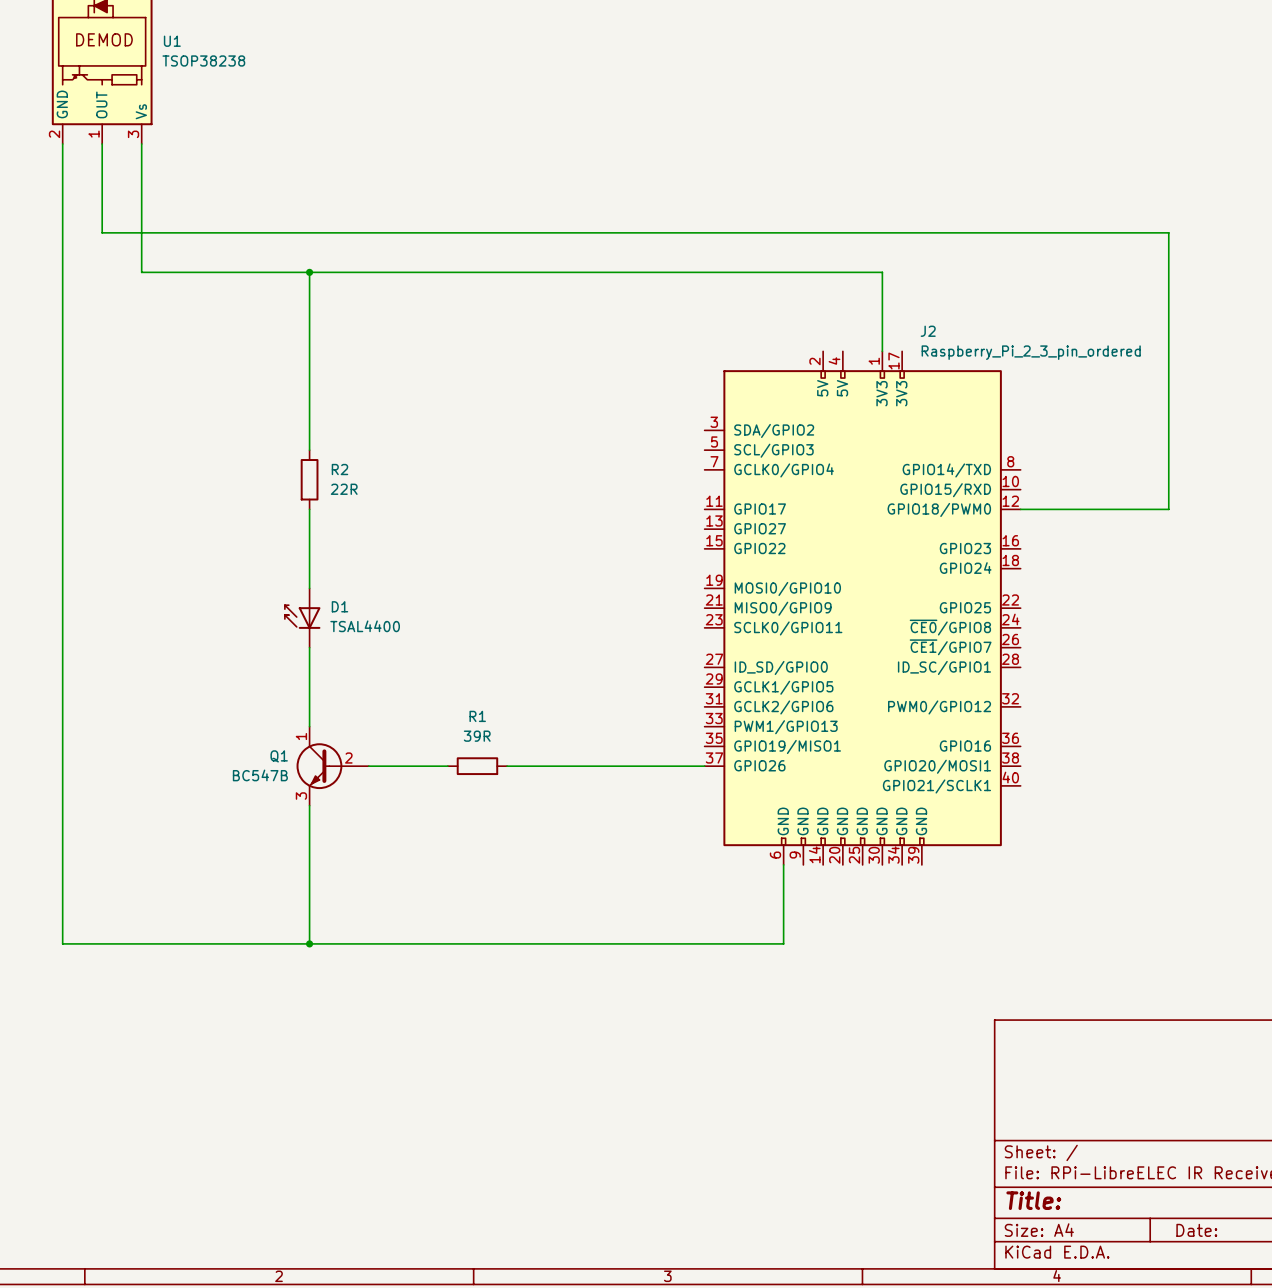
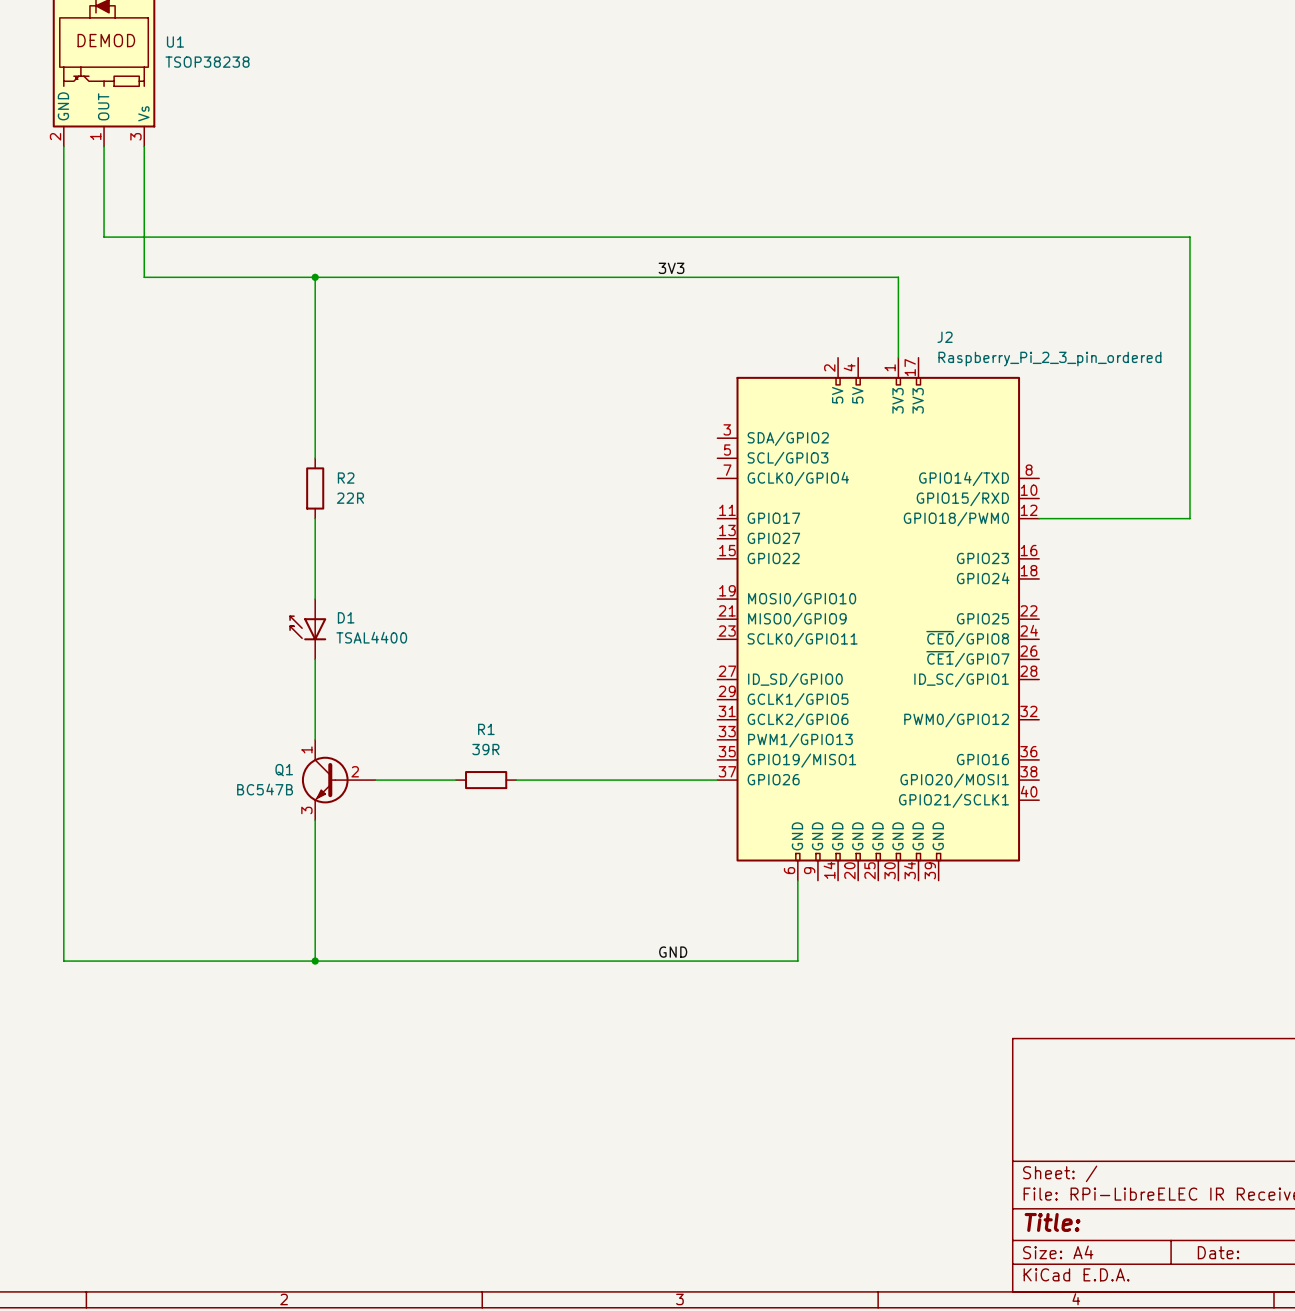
label: none -> 3V3 (671, 268)
label: none -> GND (673, 952)

